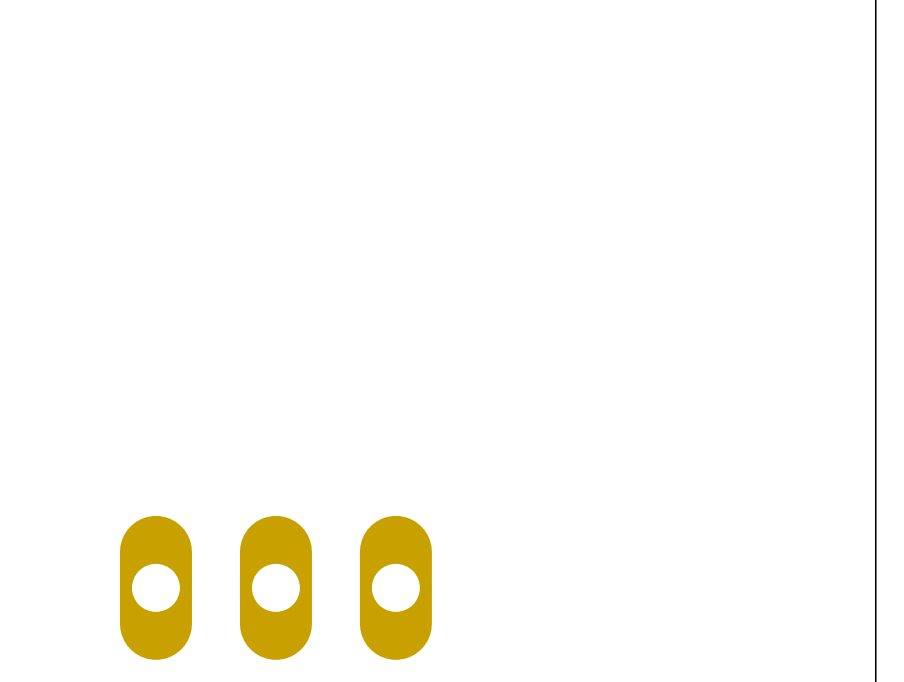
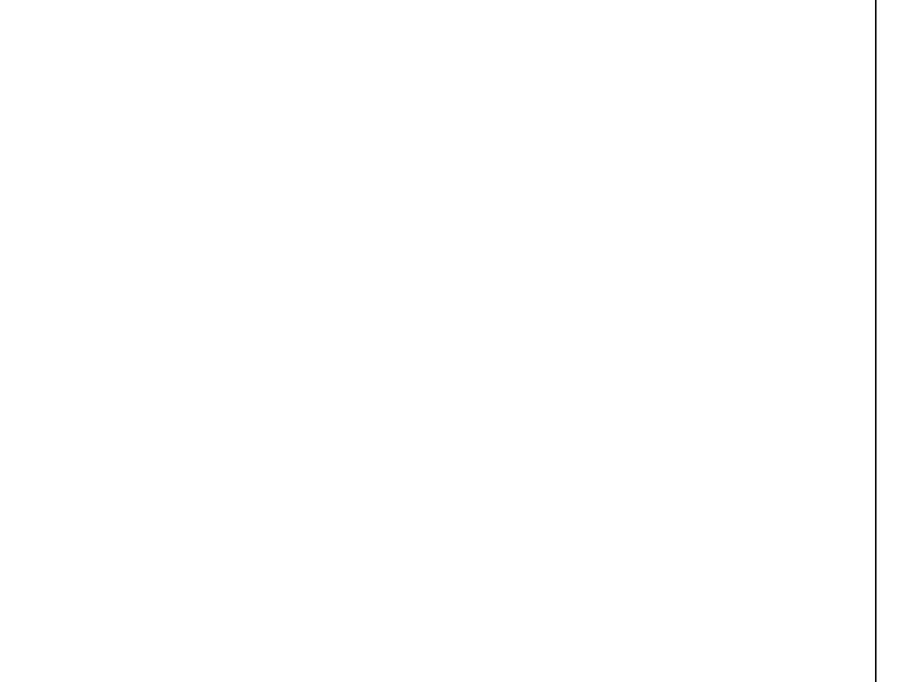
part: (275, 587) -> none

